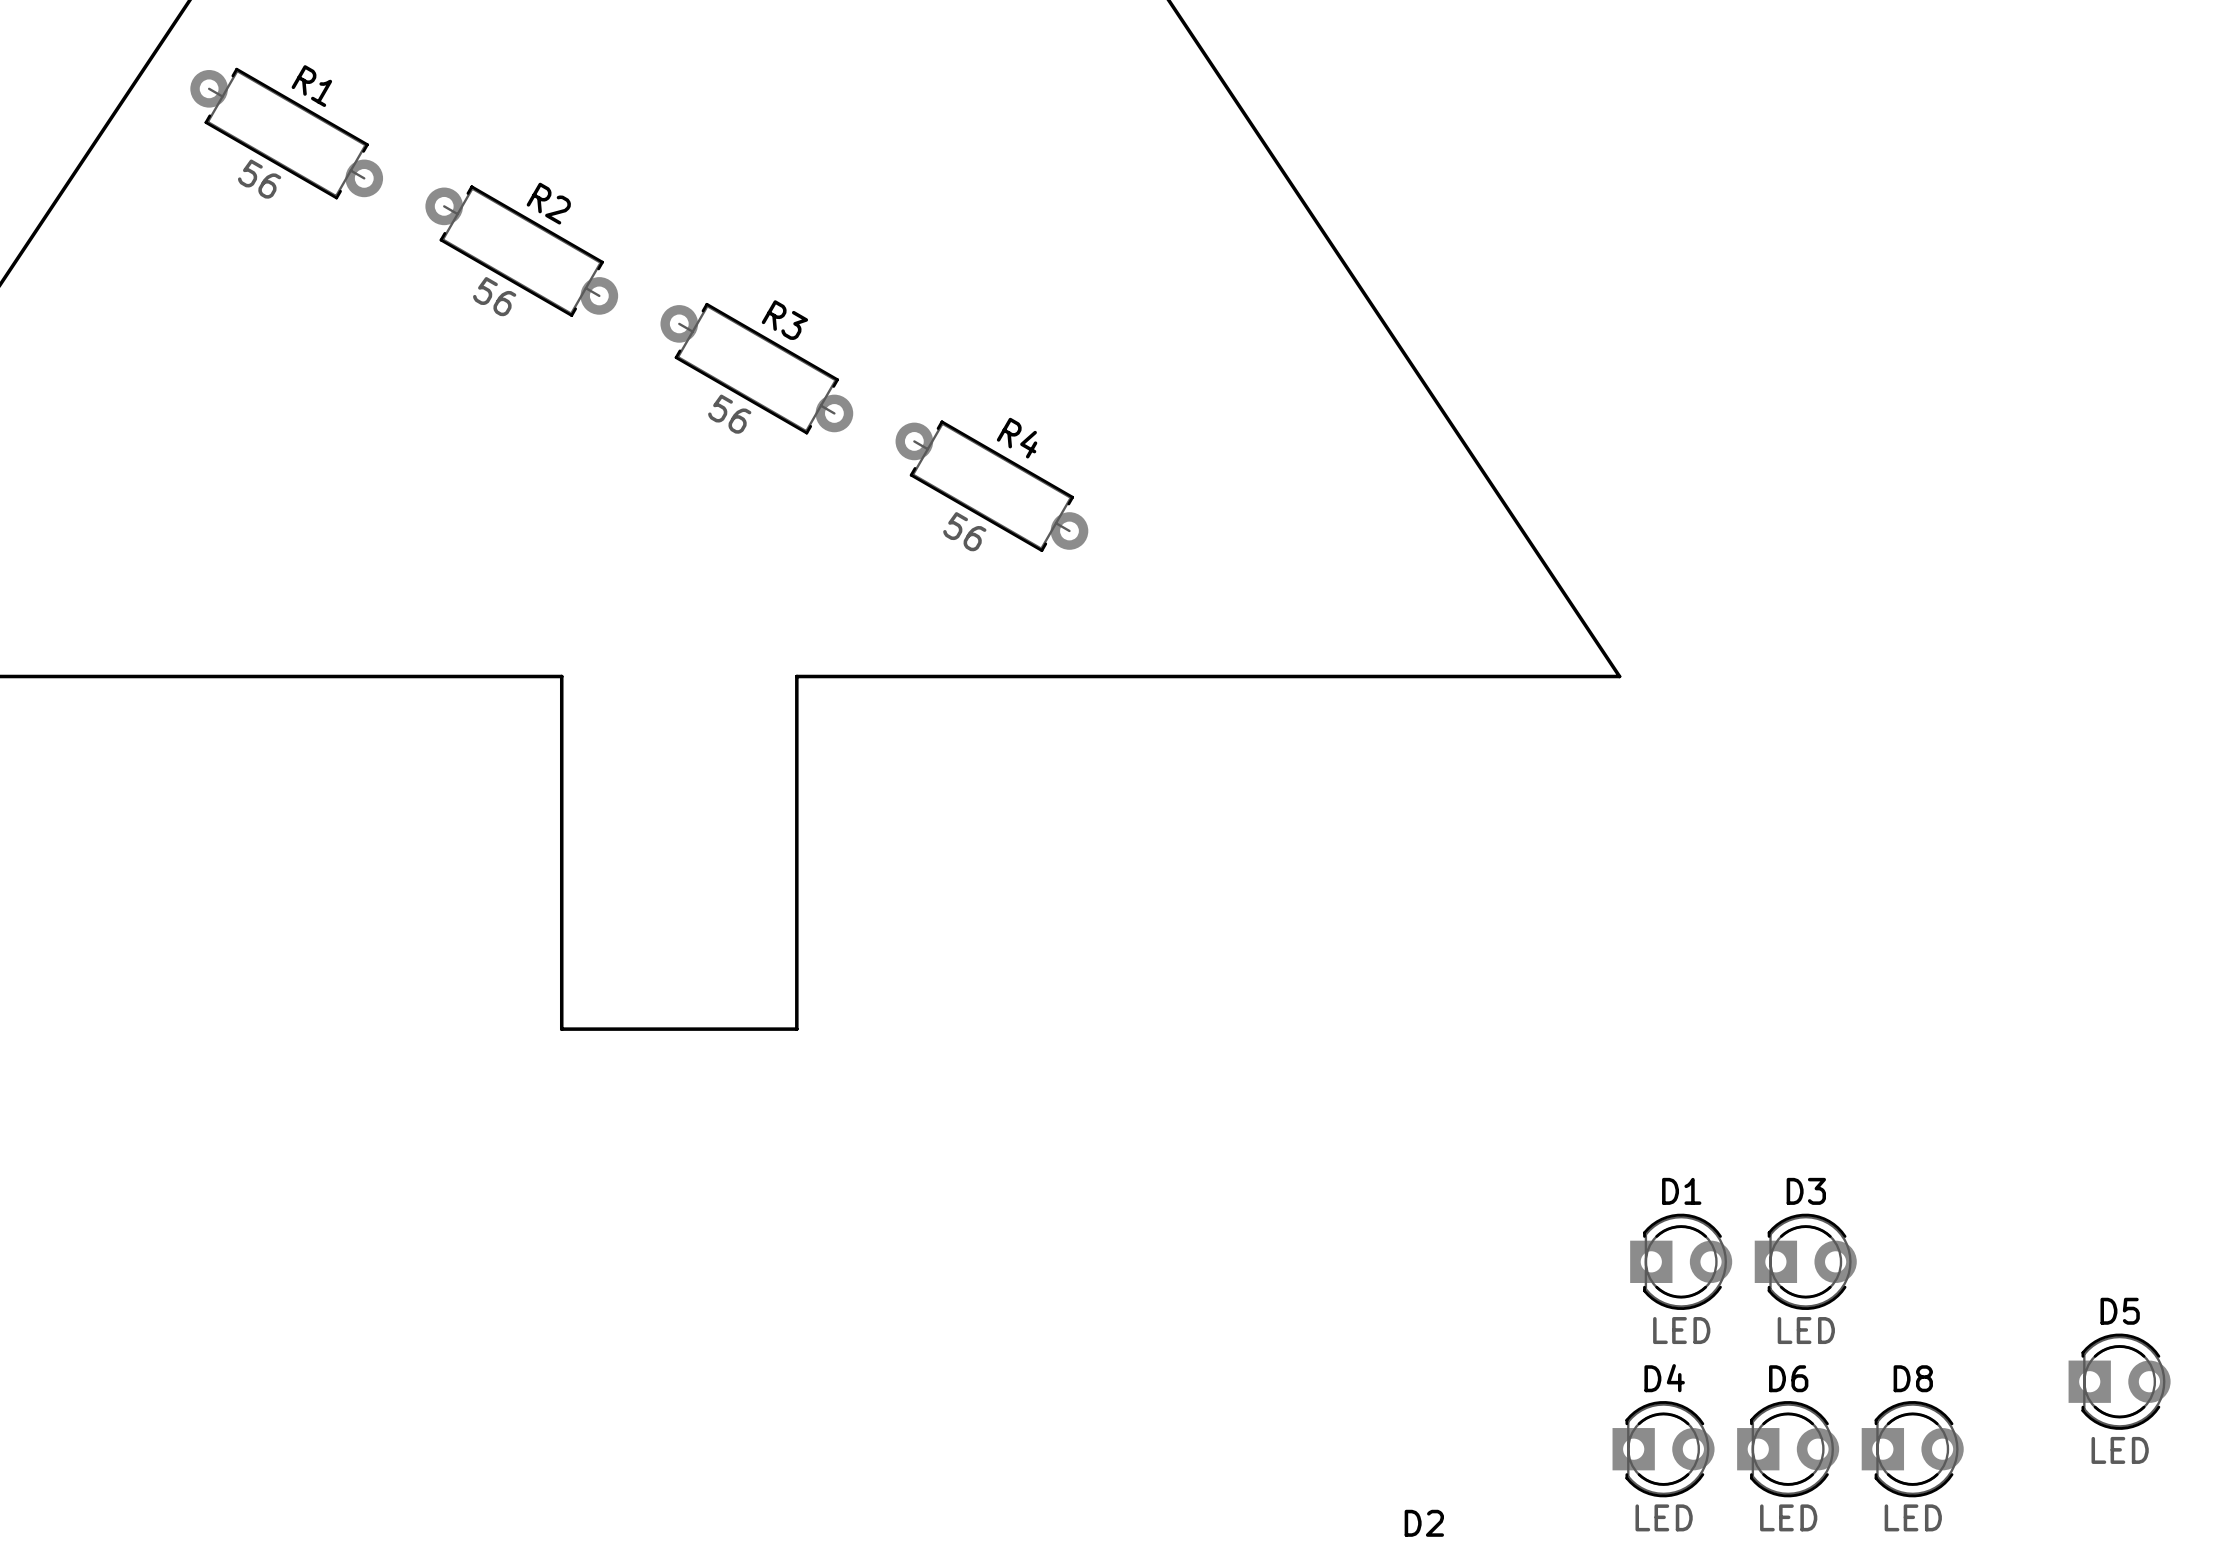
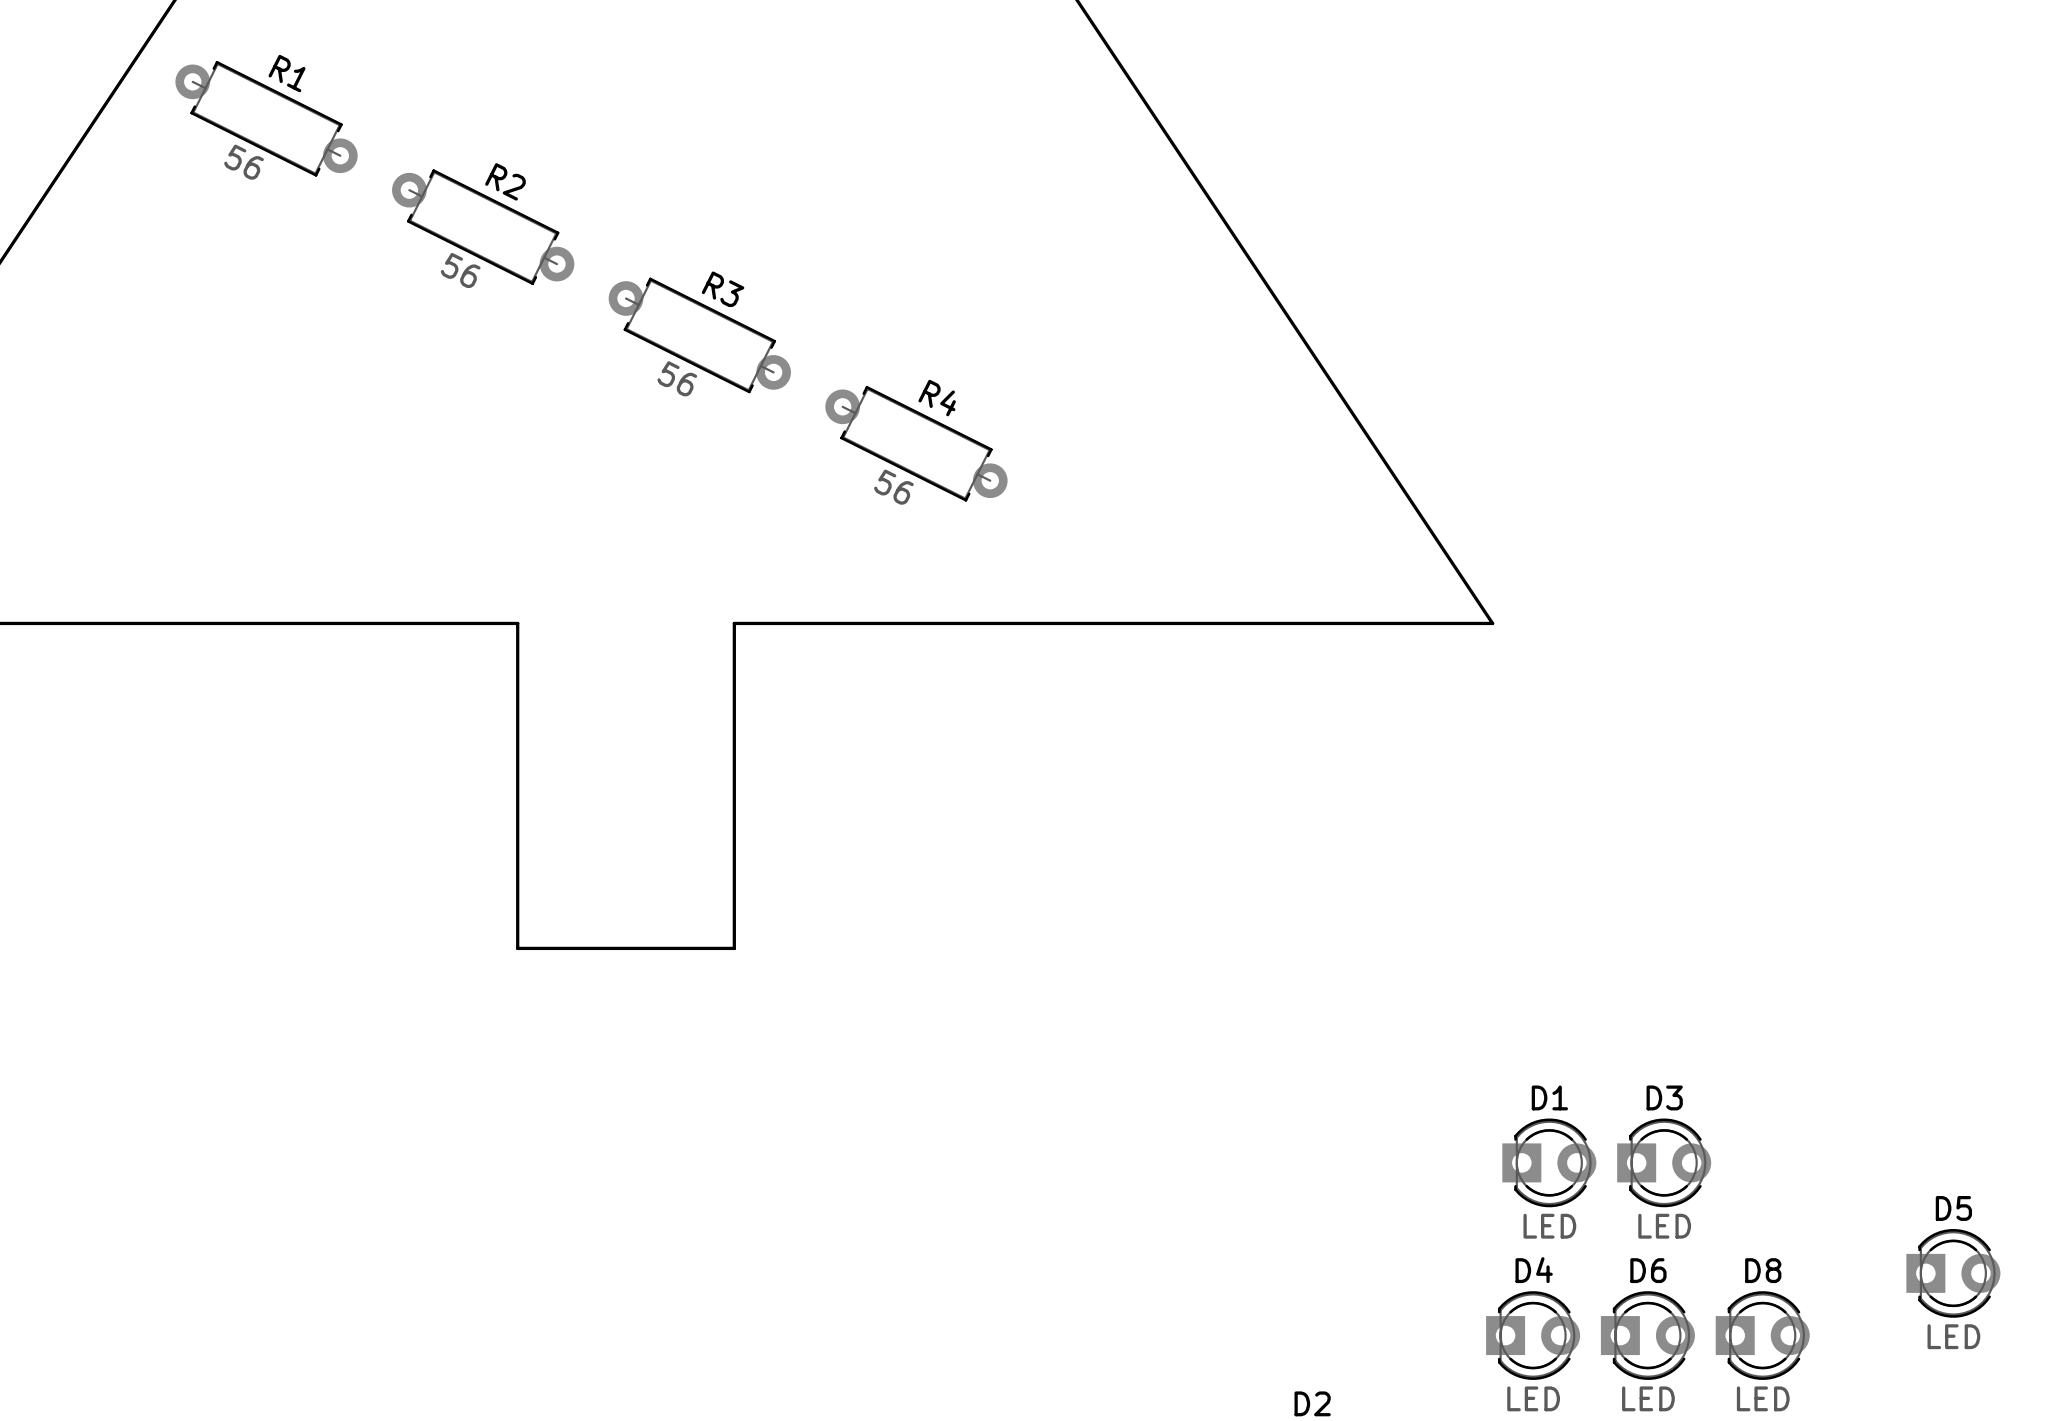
R1 rotation: 0° (286, 133) -> 3.4° counterclockwise (266, 118)
R2 rotation: 0° (521, 251) -> 3.4° counterclockwise (483, 227)
R3 rotation: 0° (756, 368) -> 3.4° counterclockwise (699, 335)
R4 rotation: 0° (991, 486) -> 3.4° counterclockwise (916, 443)

